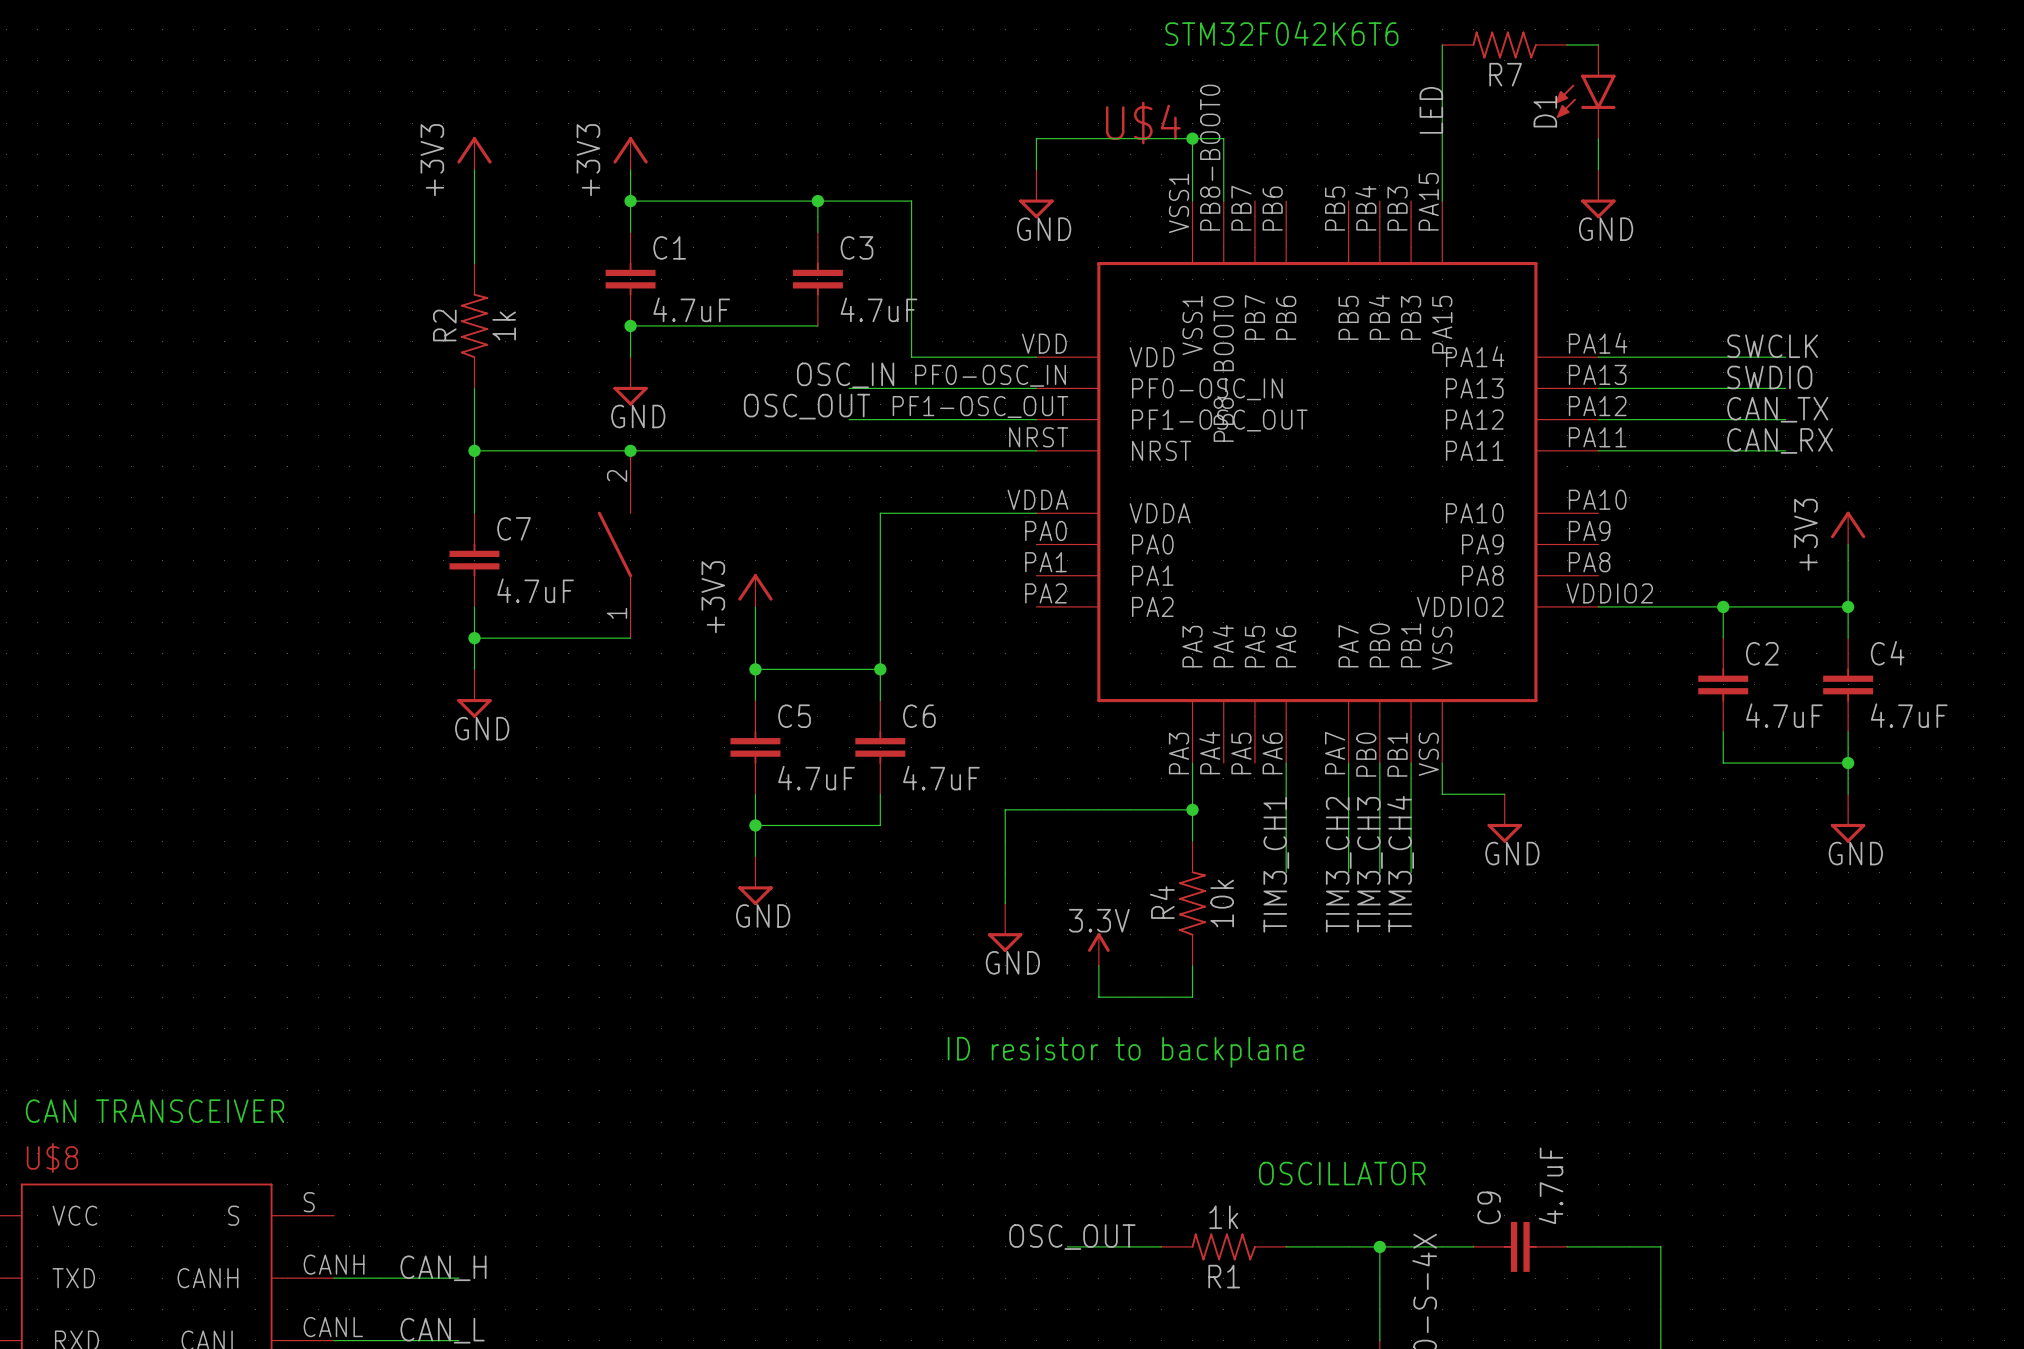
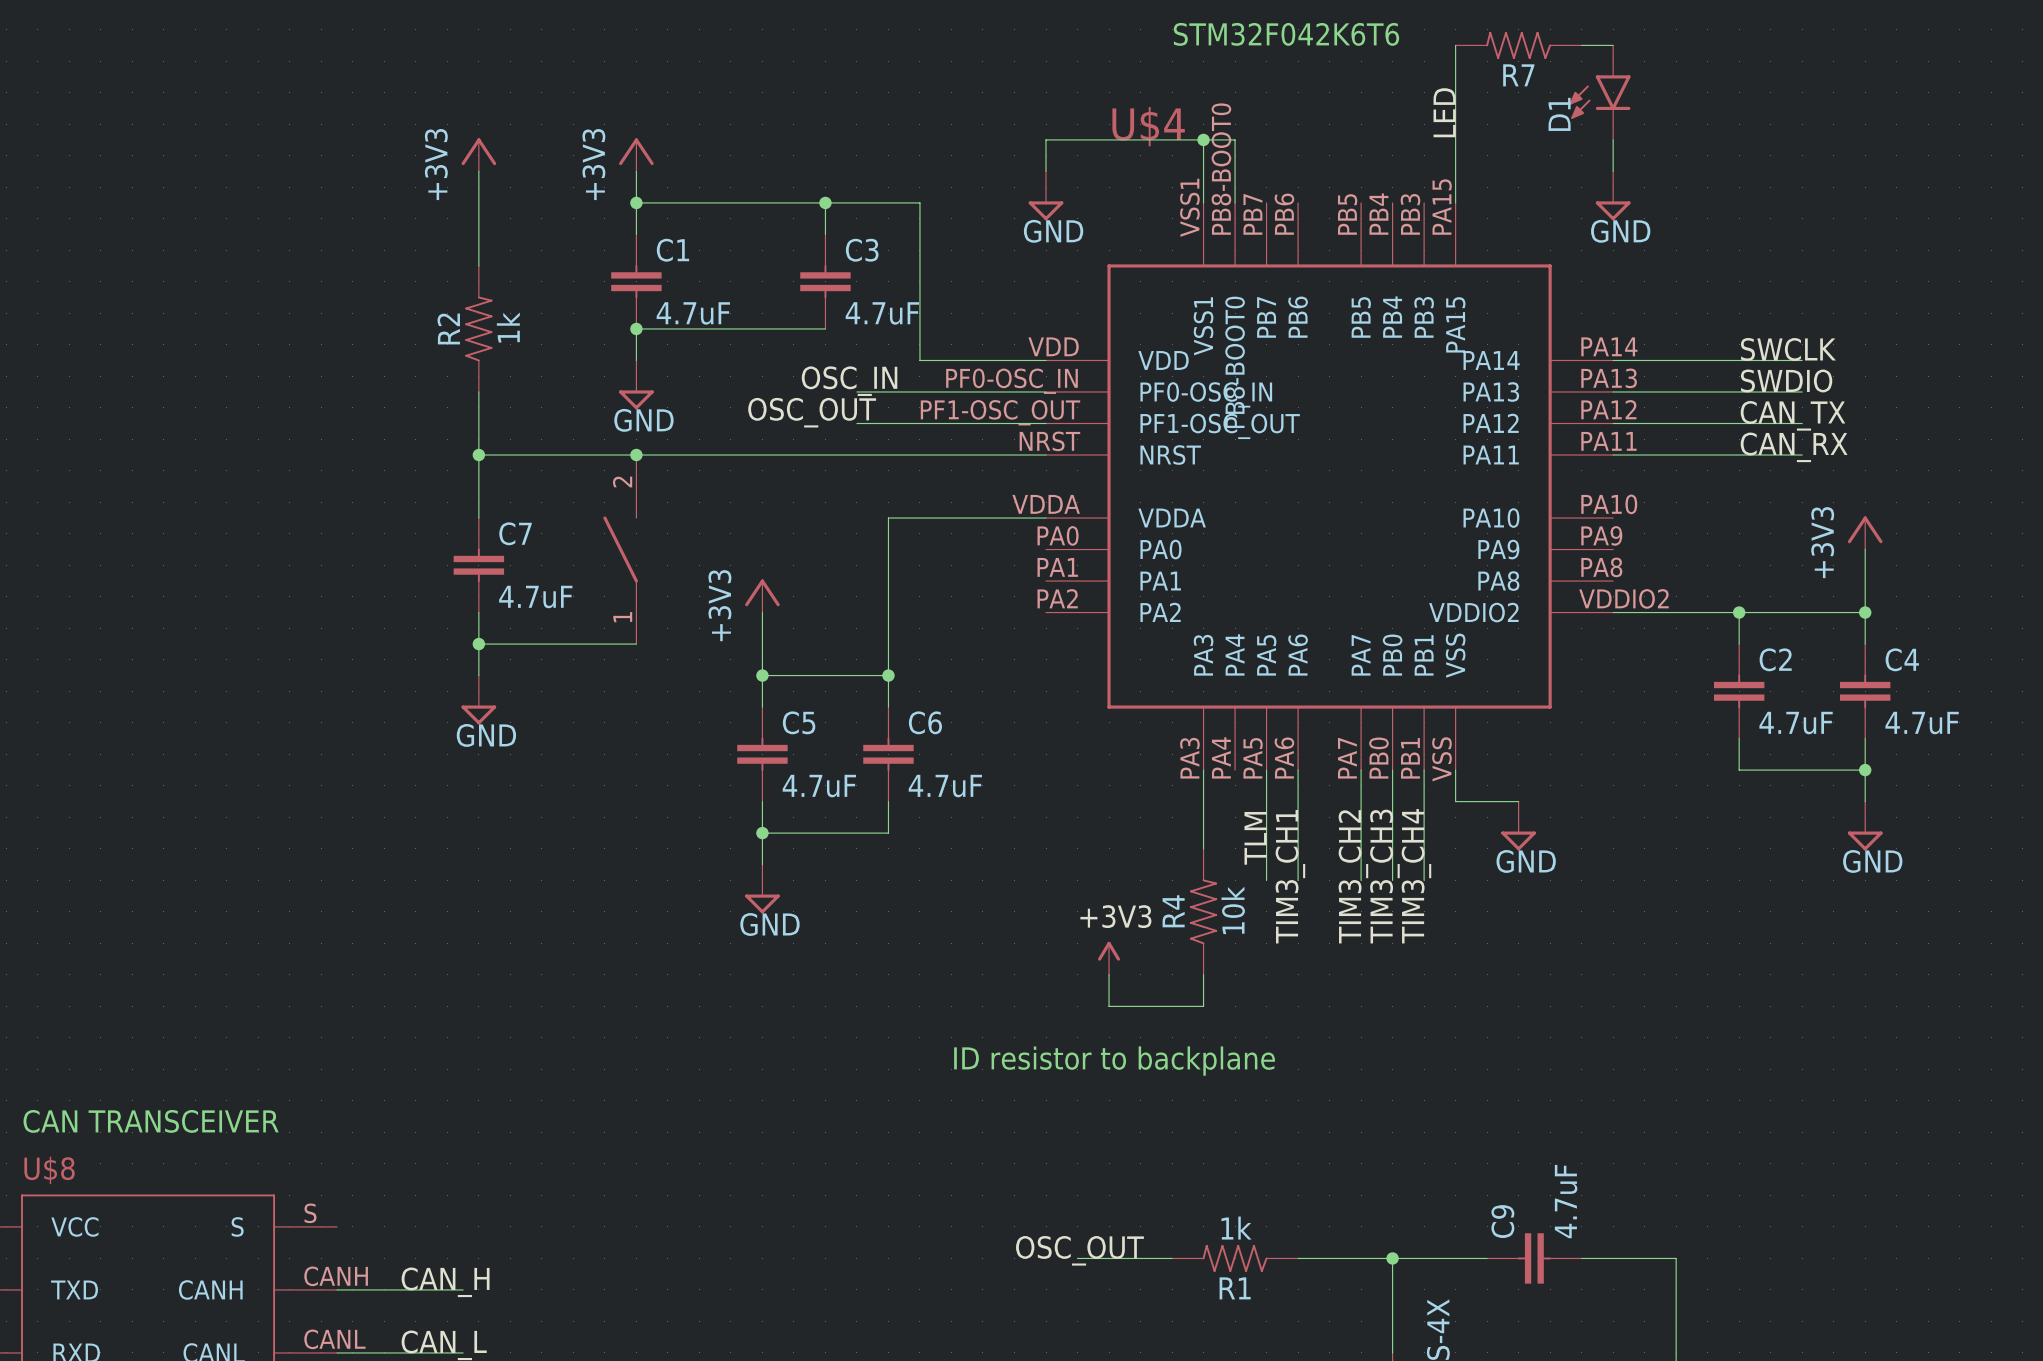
wire: none -> (1266, 770) (1266, 880)
wire: (1192, 809) (1005, 809) (1005, 903) -> none
junction: (1192, 809) -> none
label: none -> TLM (1255, 838)
label: none -> +3V3 (1115, 916)
power symbol text: 3.3V (1099, 920) -> none
power symbol: GND (1005, 927) -> none
text: OSCILLATOR (1342, 1173) -> none

